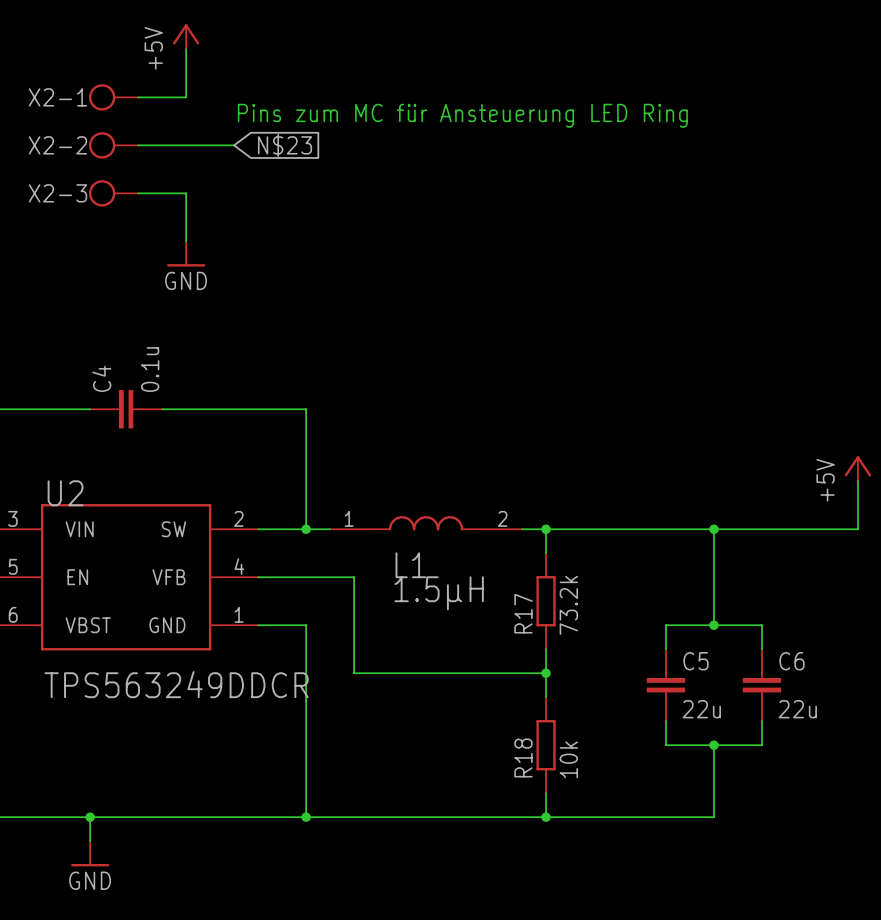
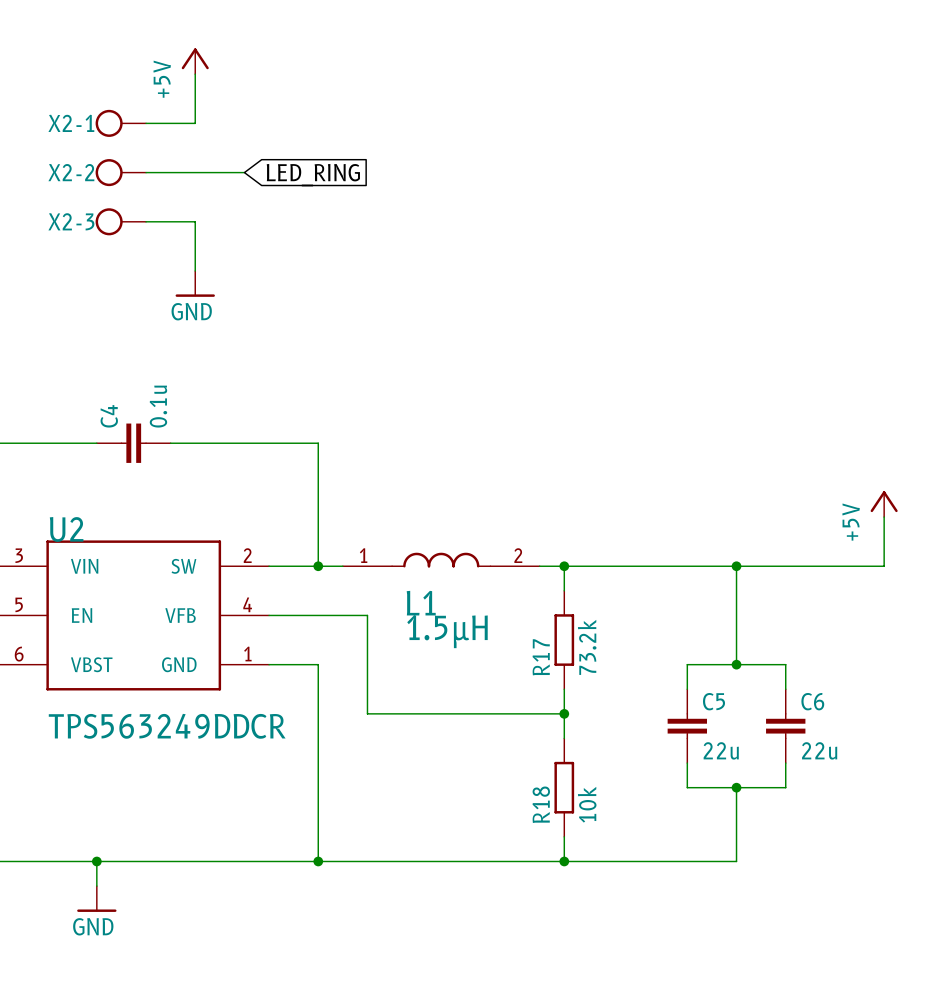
text: Pins zum MC für Ansteuerung LED Ring (462, 115) -> none
global label: N$23 (285, 145) -> LED_RING (313, 175)

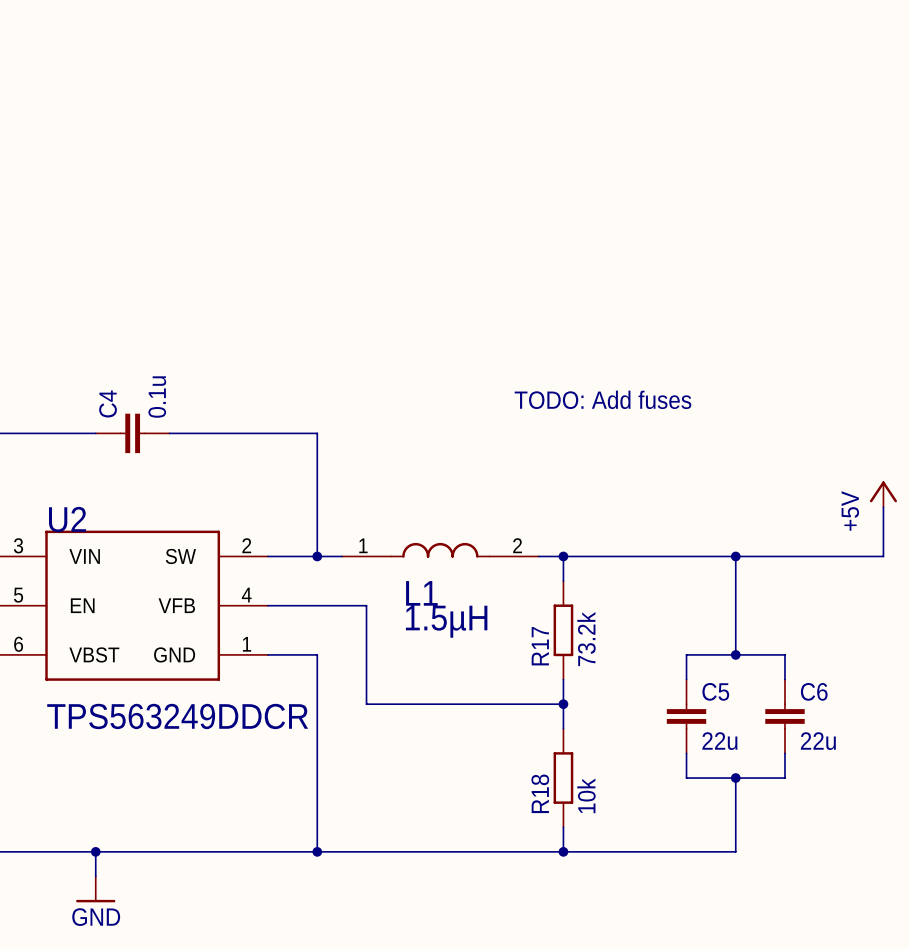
power symbol: +5V (195, 61) -> none
wire: (195, 74) (195, 123) (146, 123) -> none
X2-1: (120, 123) -> none
X2-2: (120, 172) -> none
wire: (146, 172) (244, 172) -> none
global label: LED_RING (313, 175) -> none
X2-3: (120, 221) -> none
wire: (146, 221) (195, 221) (195, 271) -> none
power symbol: GND (195, 283) -> none
text: none -> TODO: Add fuses (603, 399)

